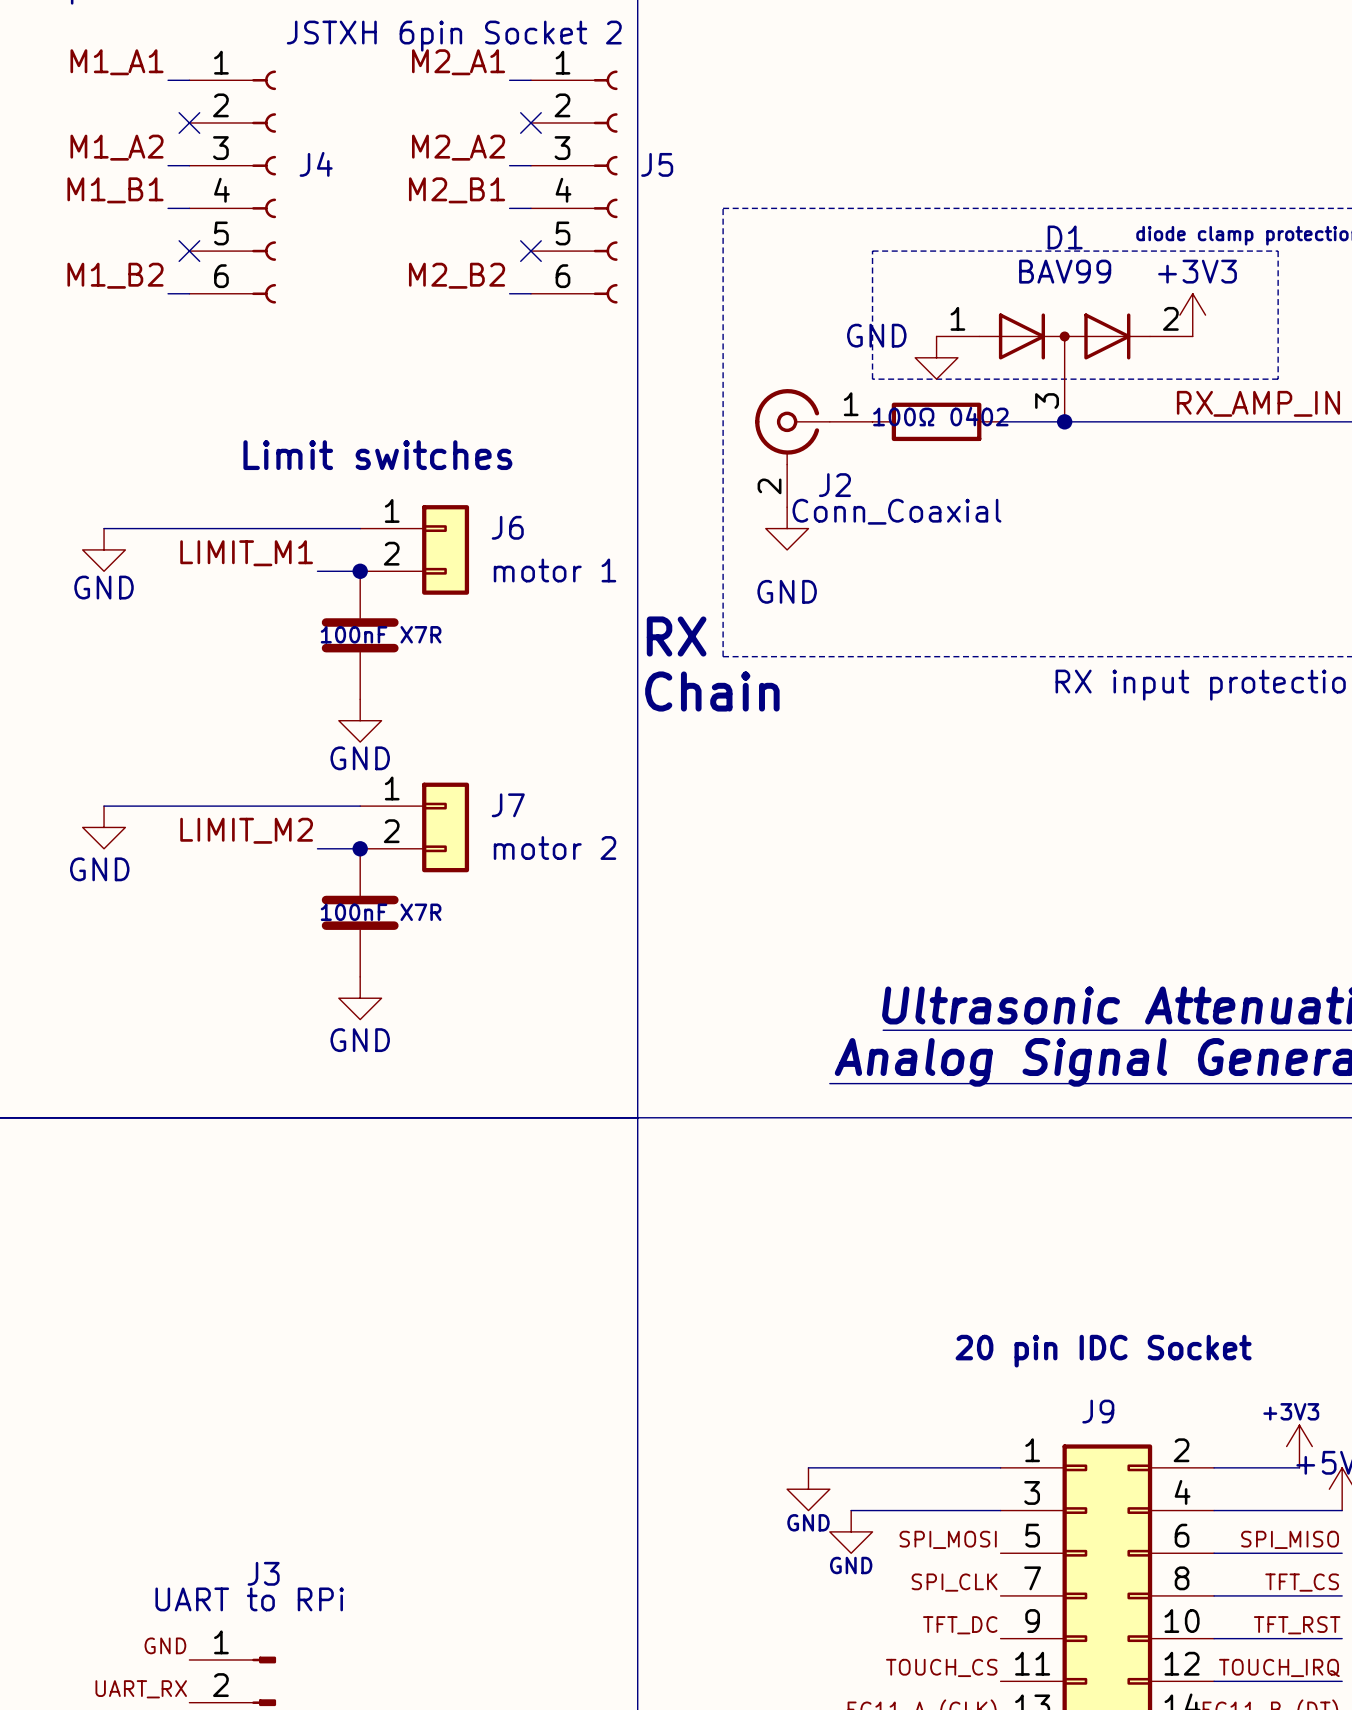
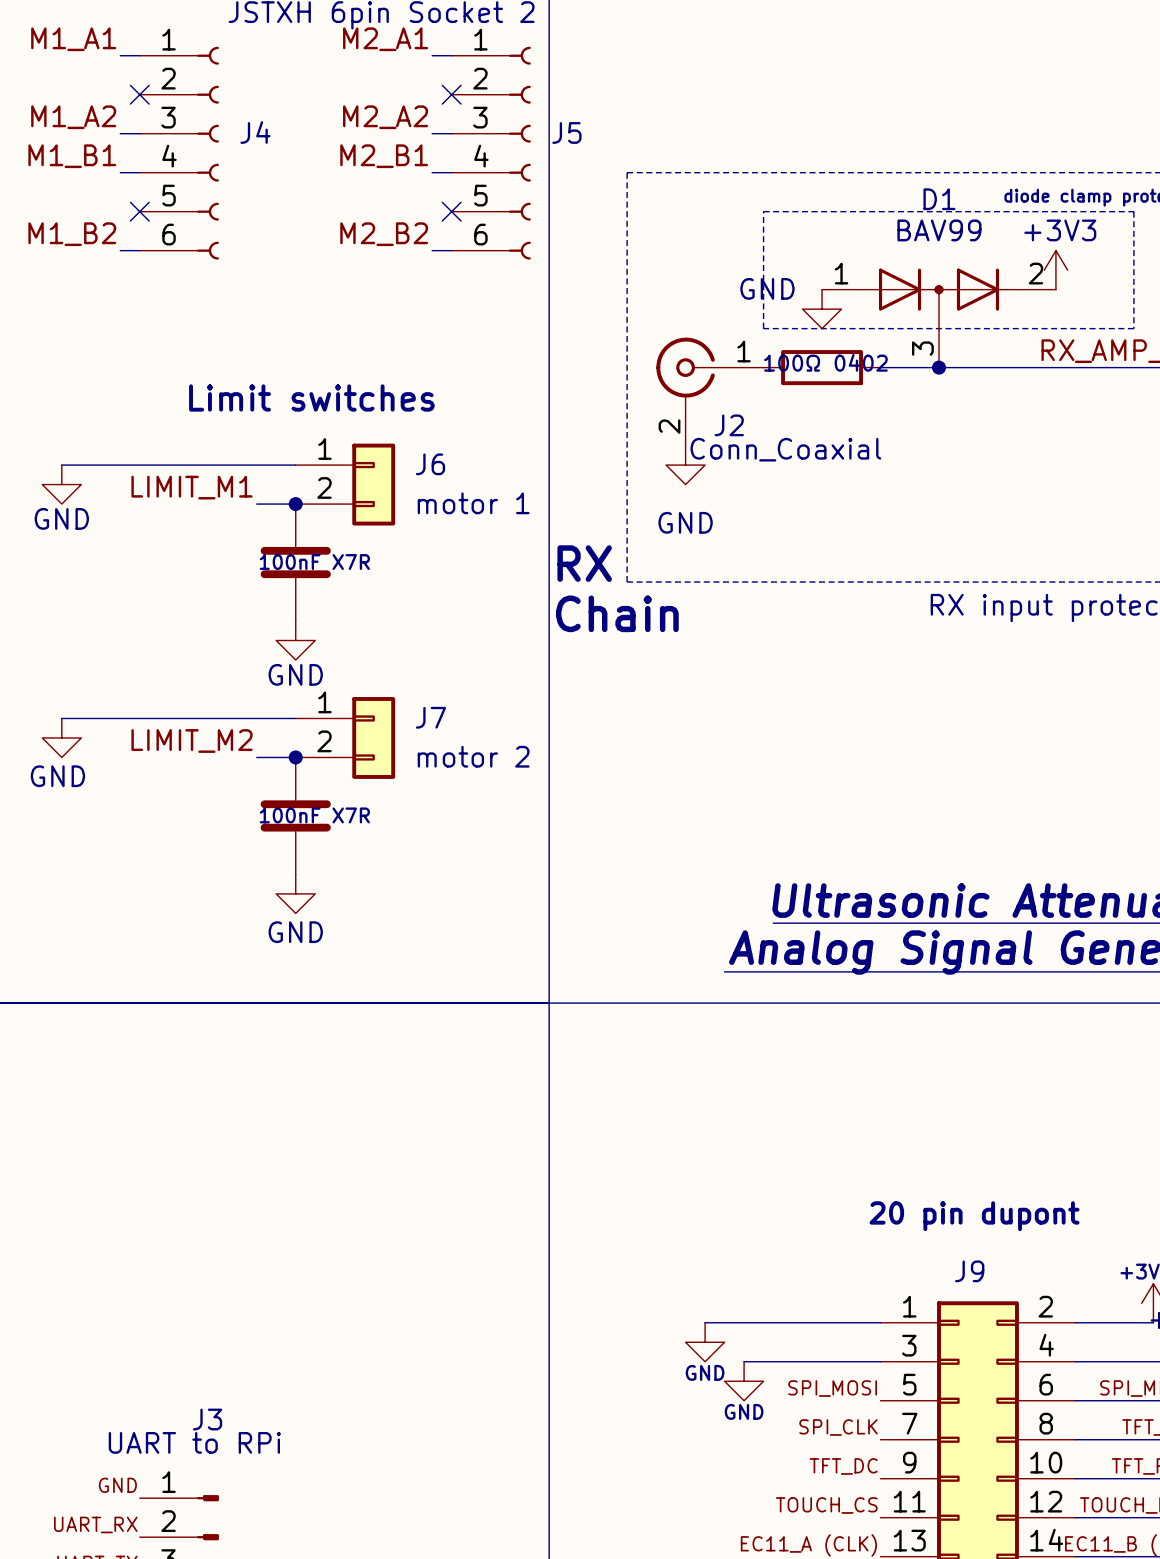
text: 20 pin IDC Socket (1103, 1351) -> 20 pin dupont (974, 1216)

